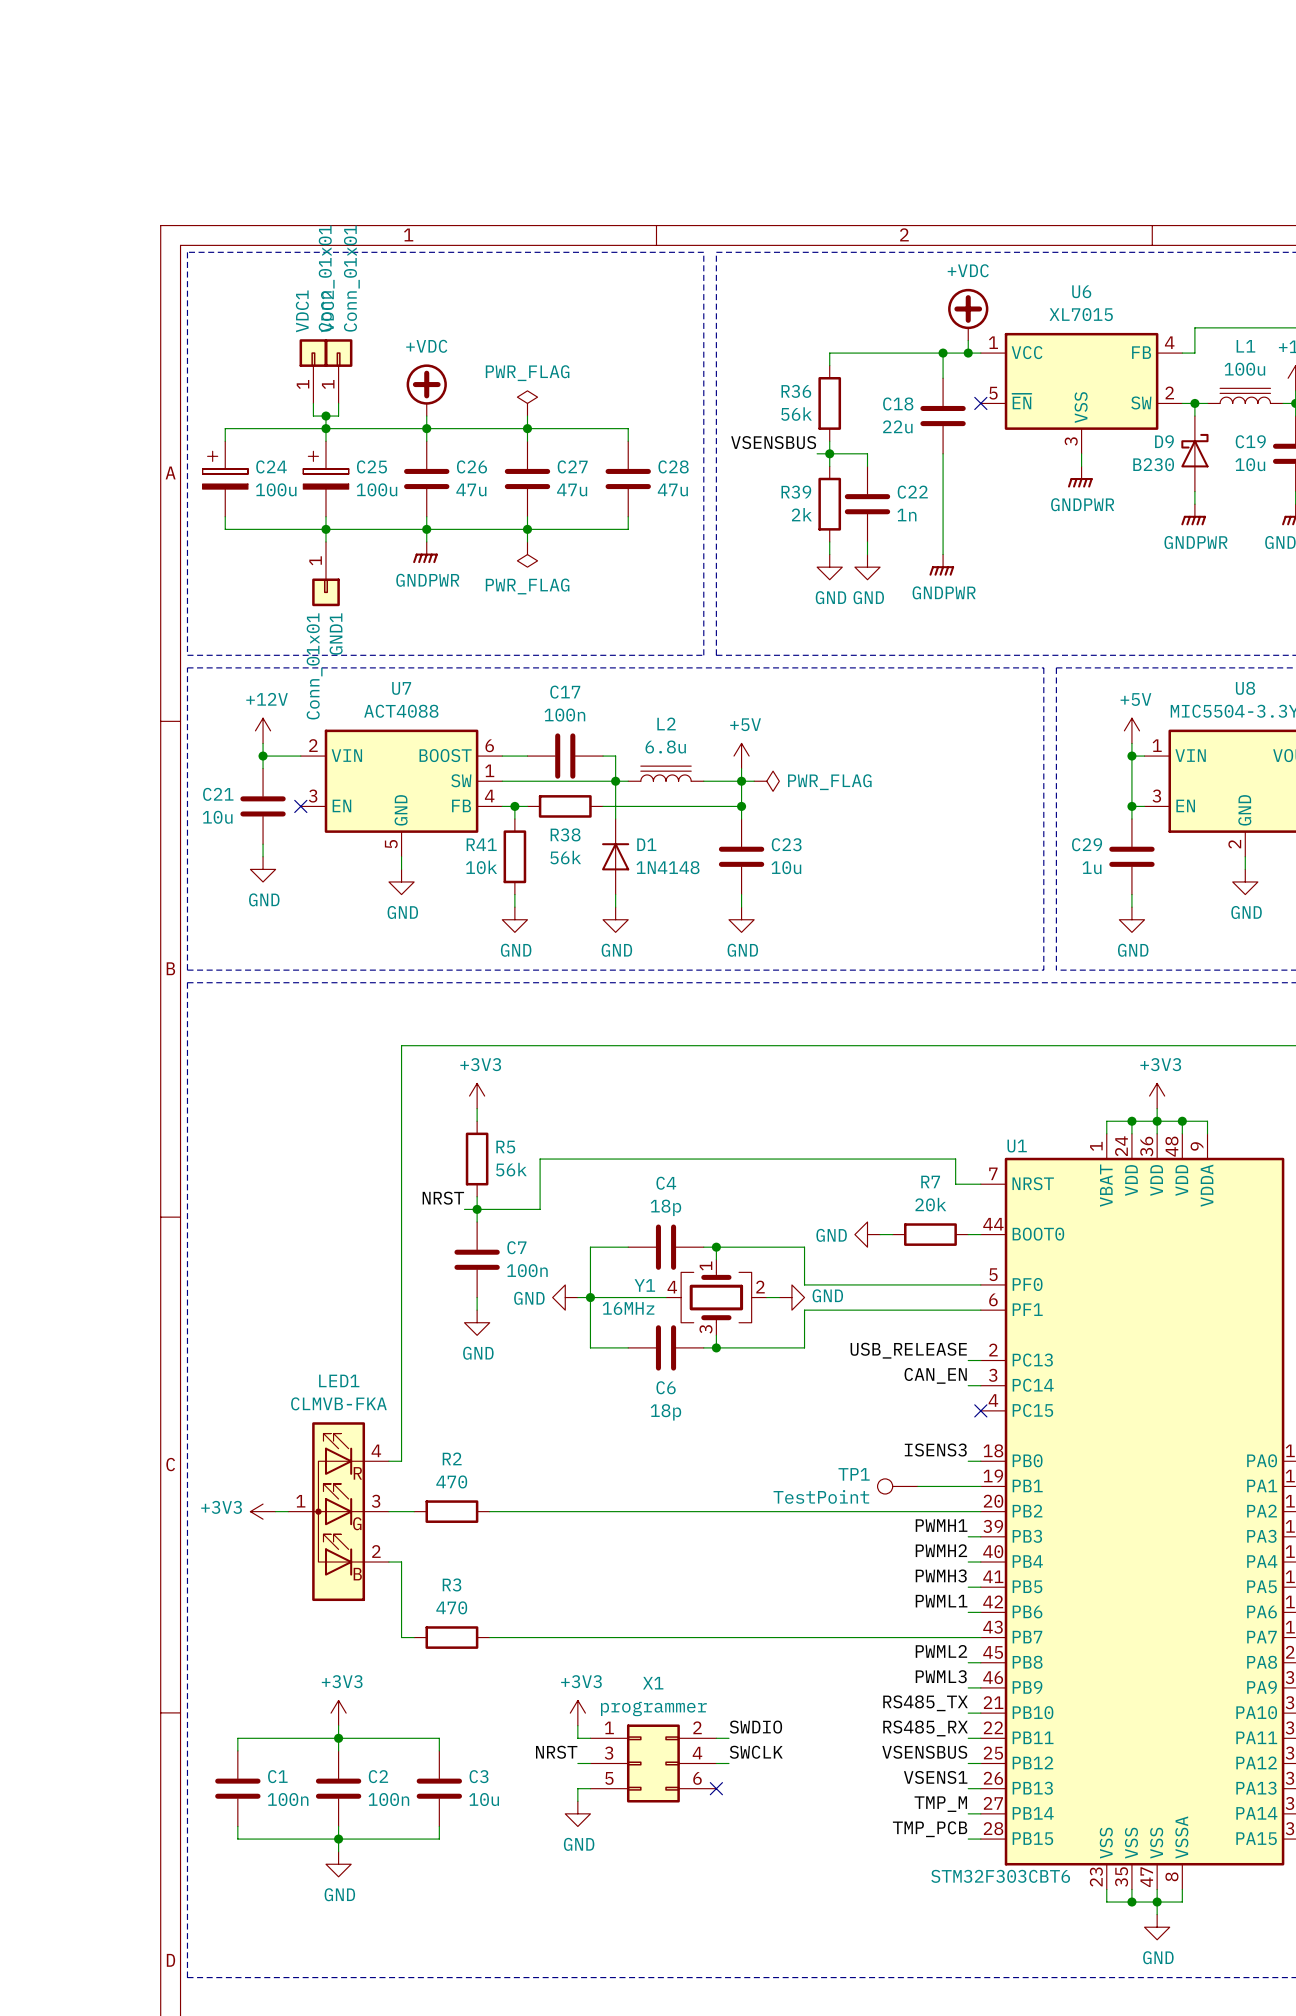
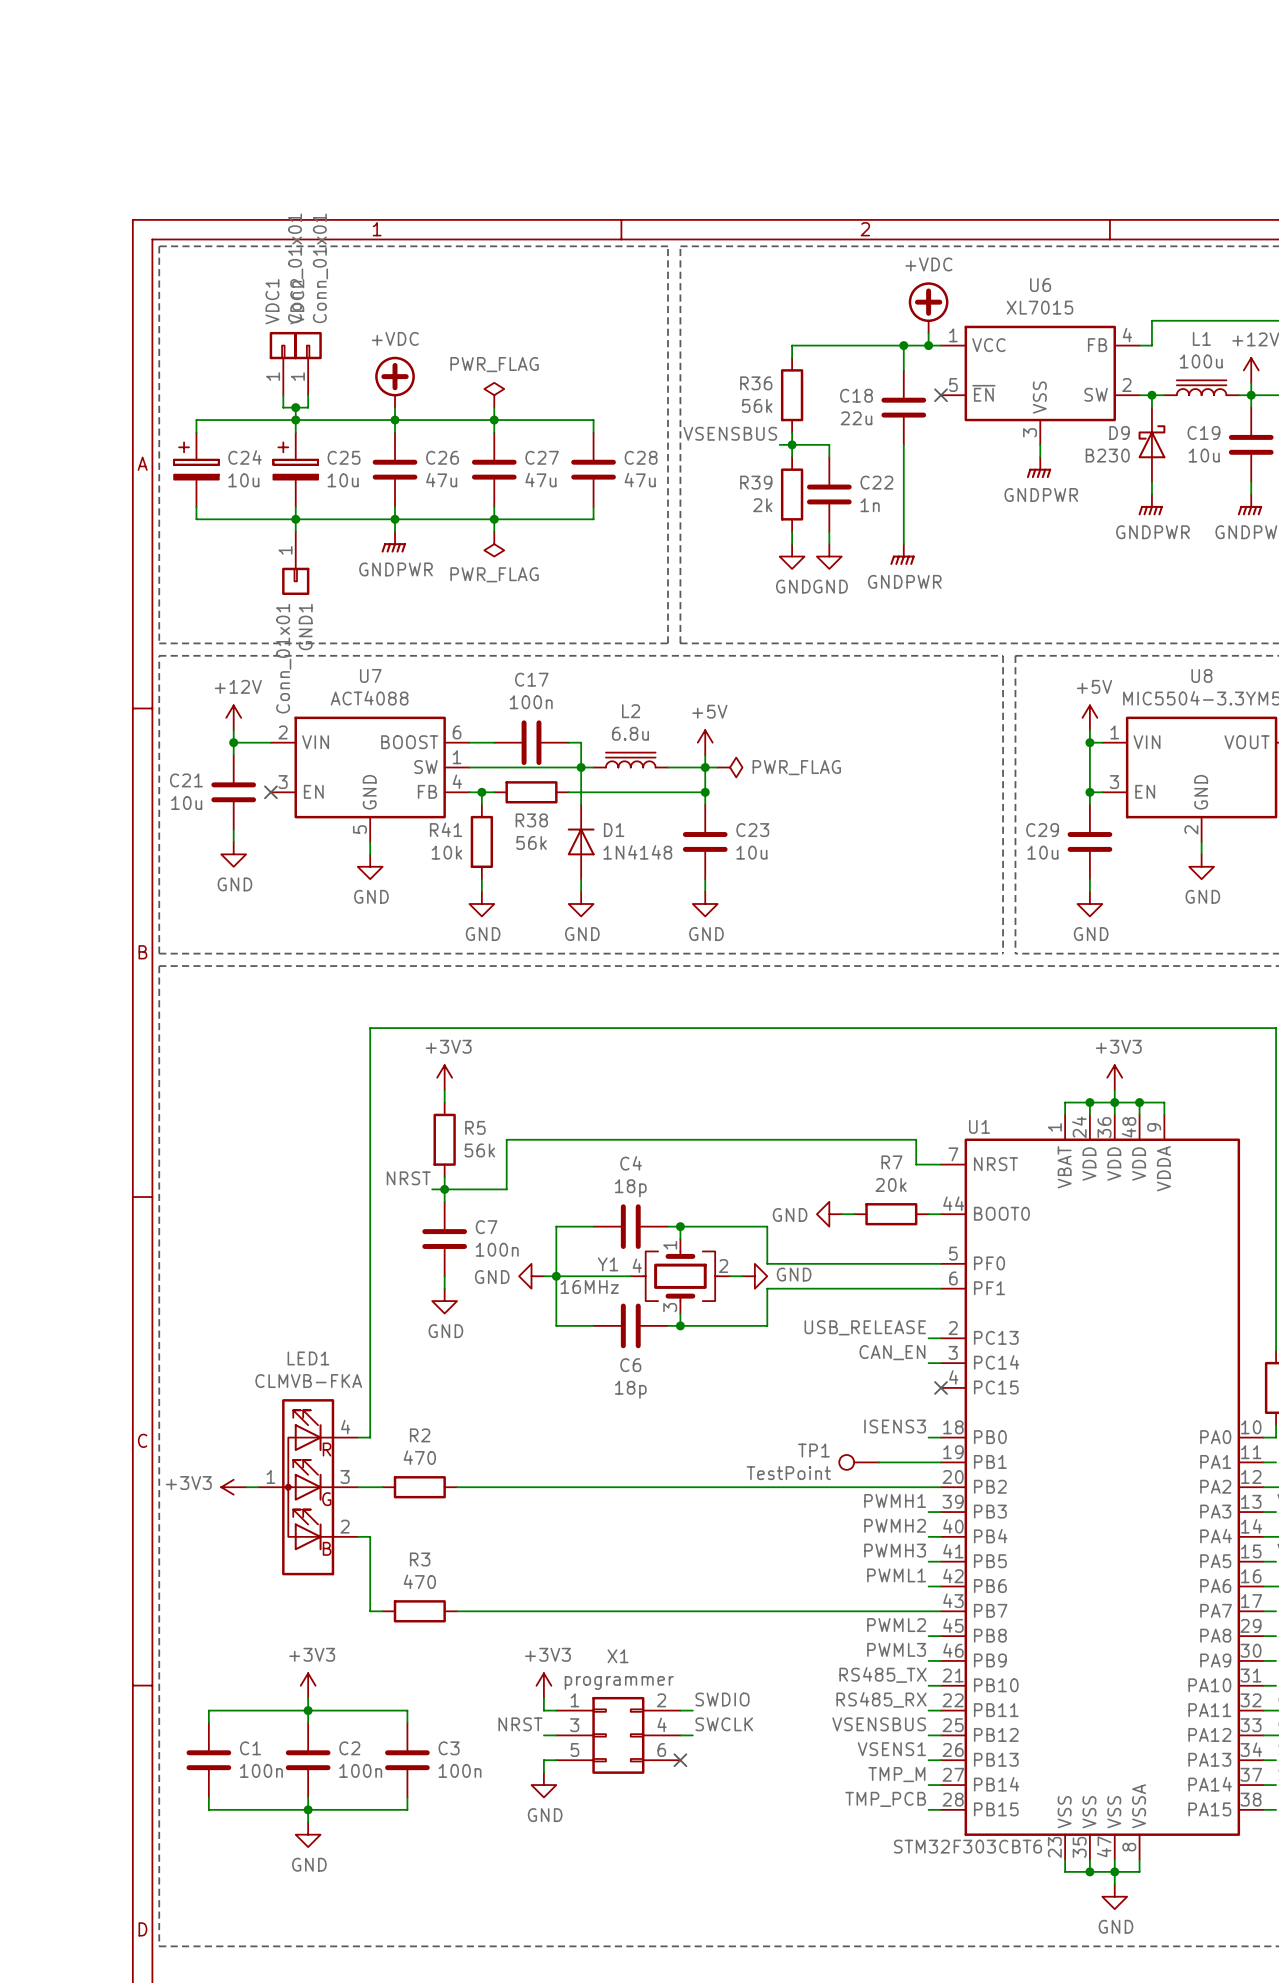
C24 value: 100u (276, 489) -> 10u (243, 480)
C25 value: 100u (376, 489) -> 10u (343, 480)
C29 value: 1u (1092, 867) -> 10u (1042, 852)
C3 value: 10u (484, 1799) -> 100n (459, 1770)

